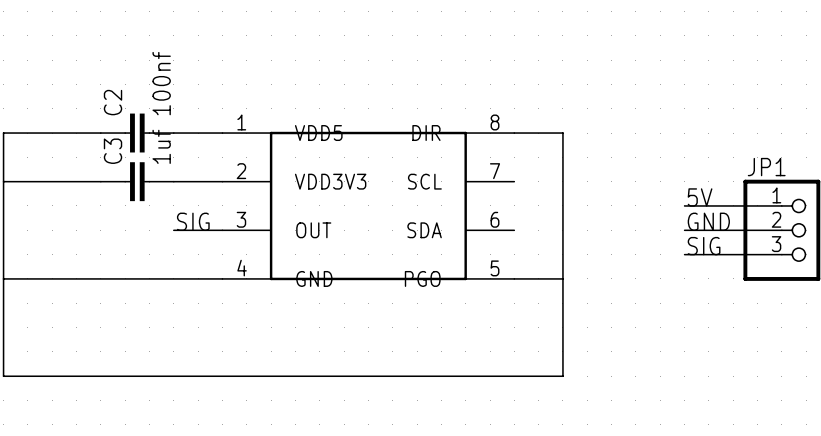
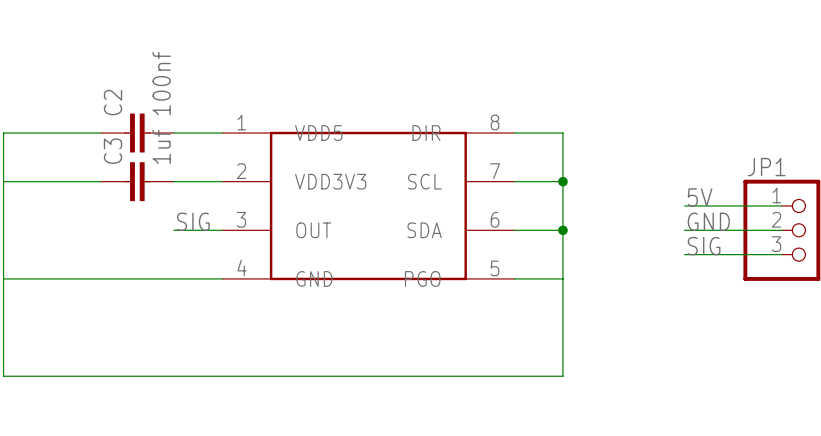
wire: none -> (514, 181) (562, 181)
junction: none -> (562, 181)
wire: none -> (514, 230) (562, 230)
junction: none -> (562, 230)

